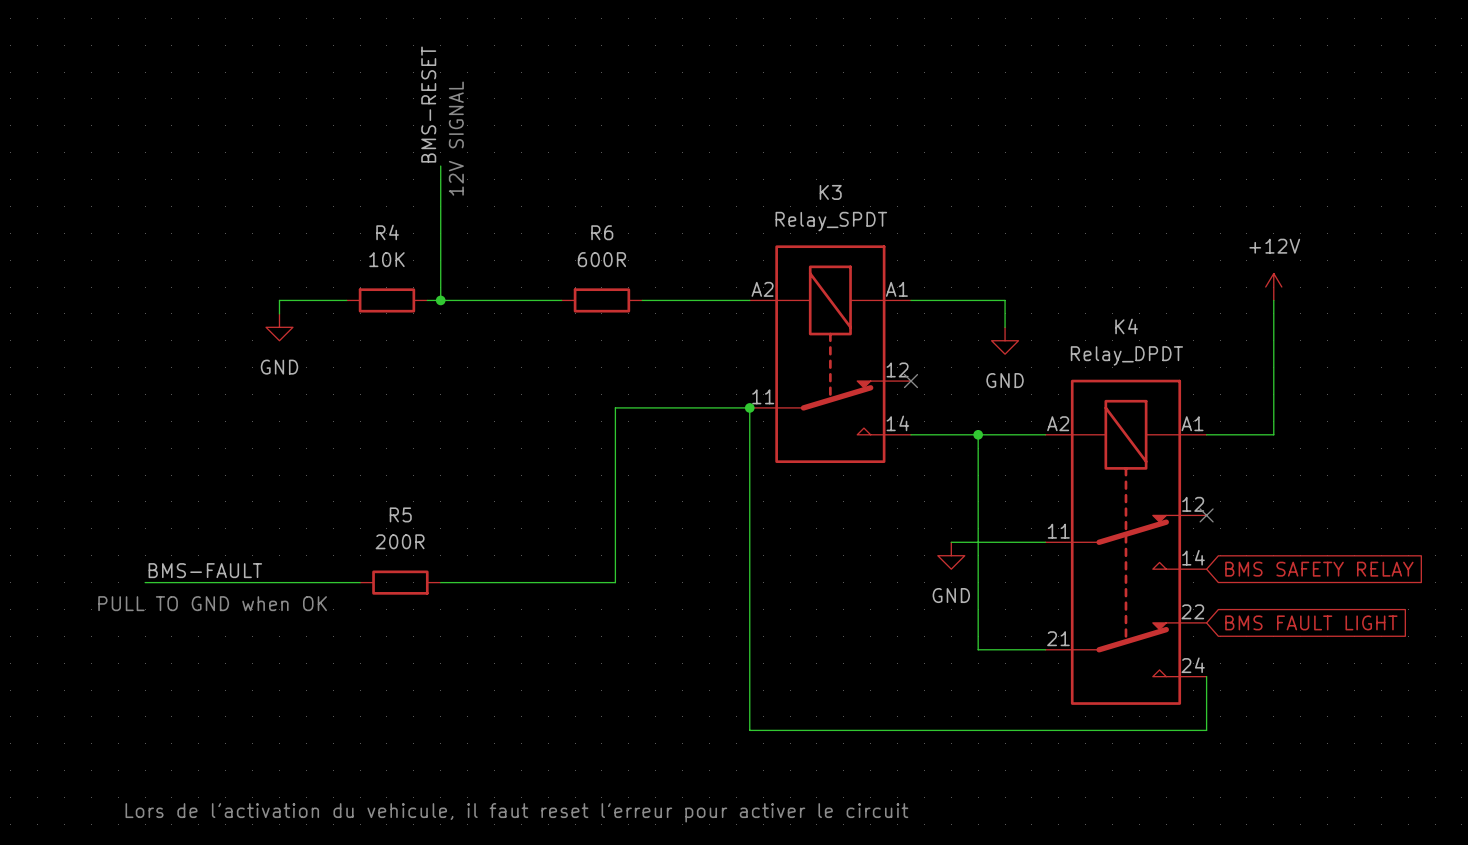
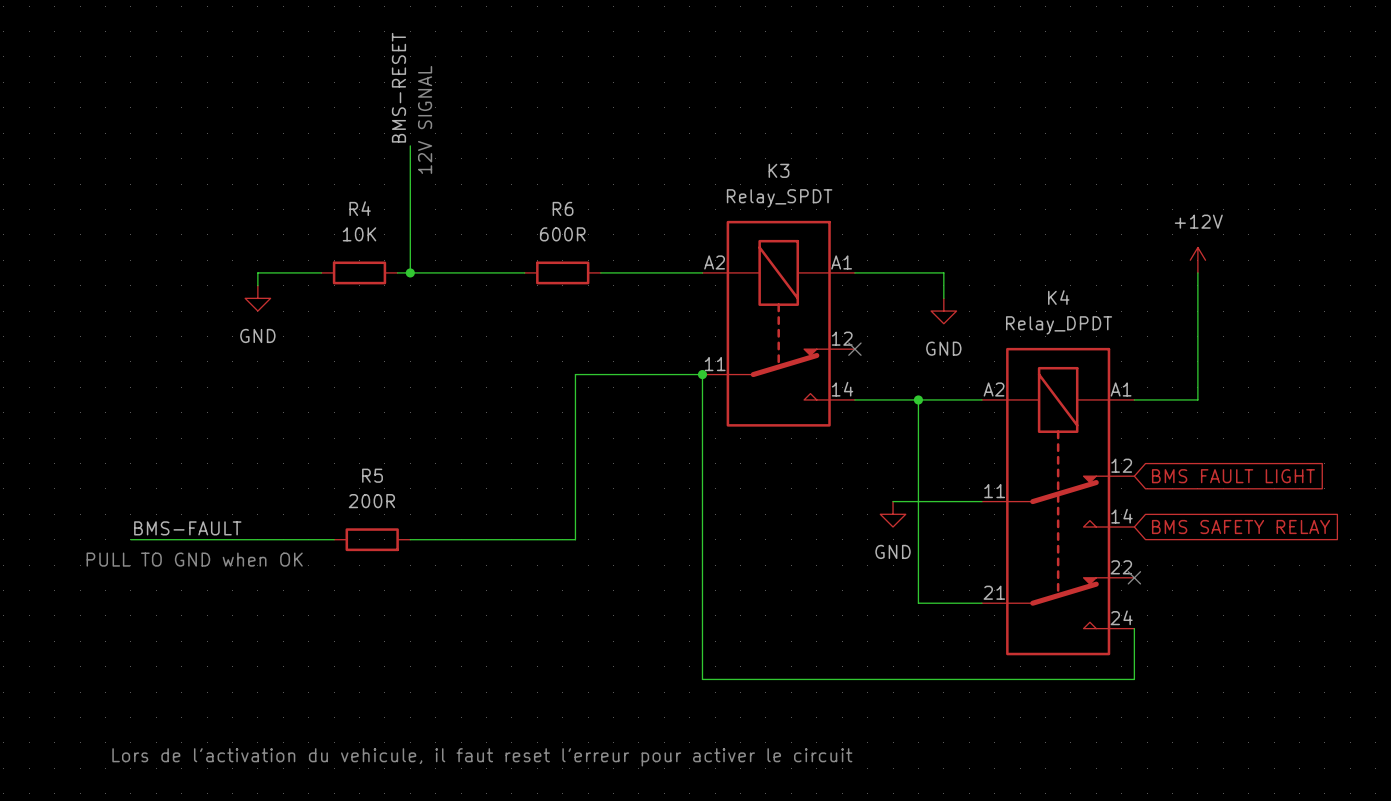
no-connect mark: (1206, 515) -> none
no-connect mark: none -> (1134, 577)
global label position: BMS FAULT LIGHT (1311, 622) -> BMS FAULT LIGHT (1233, 476)

